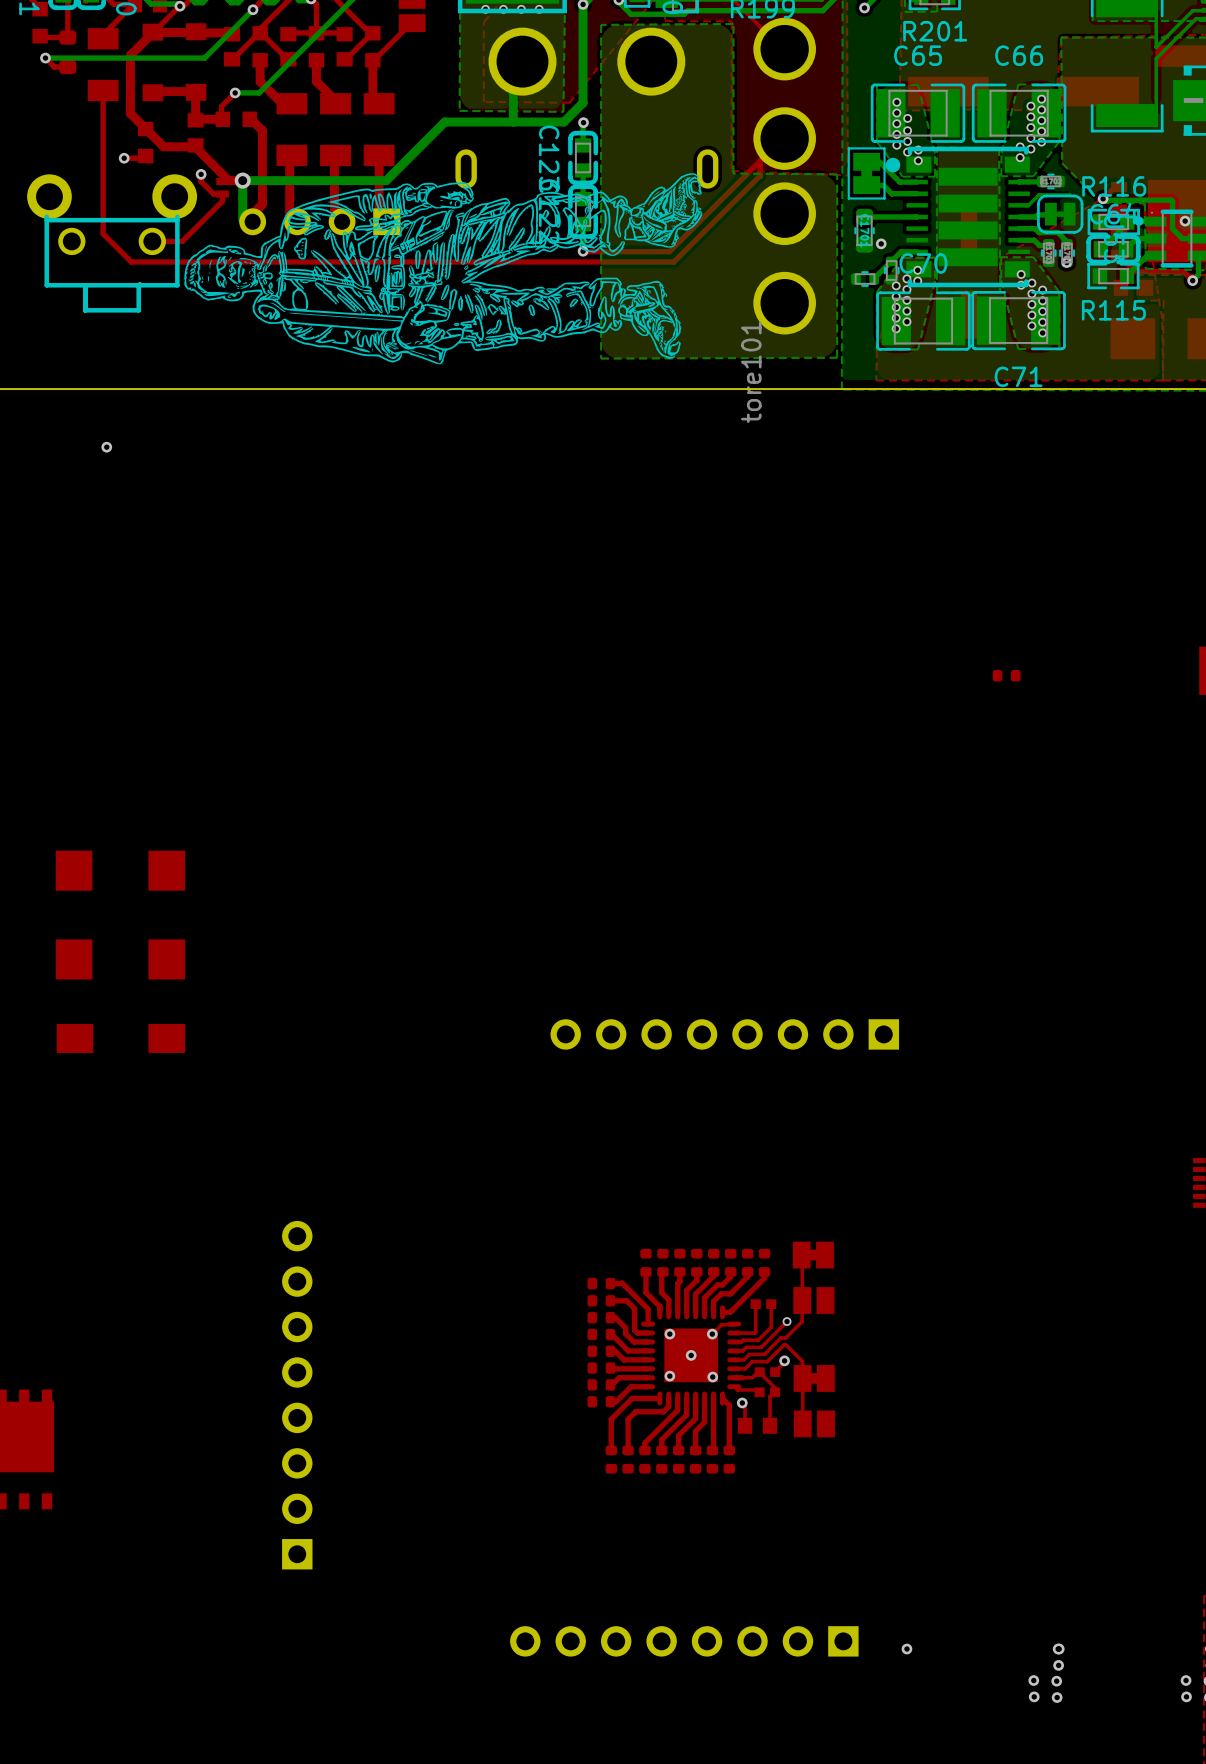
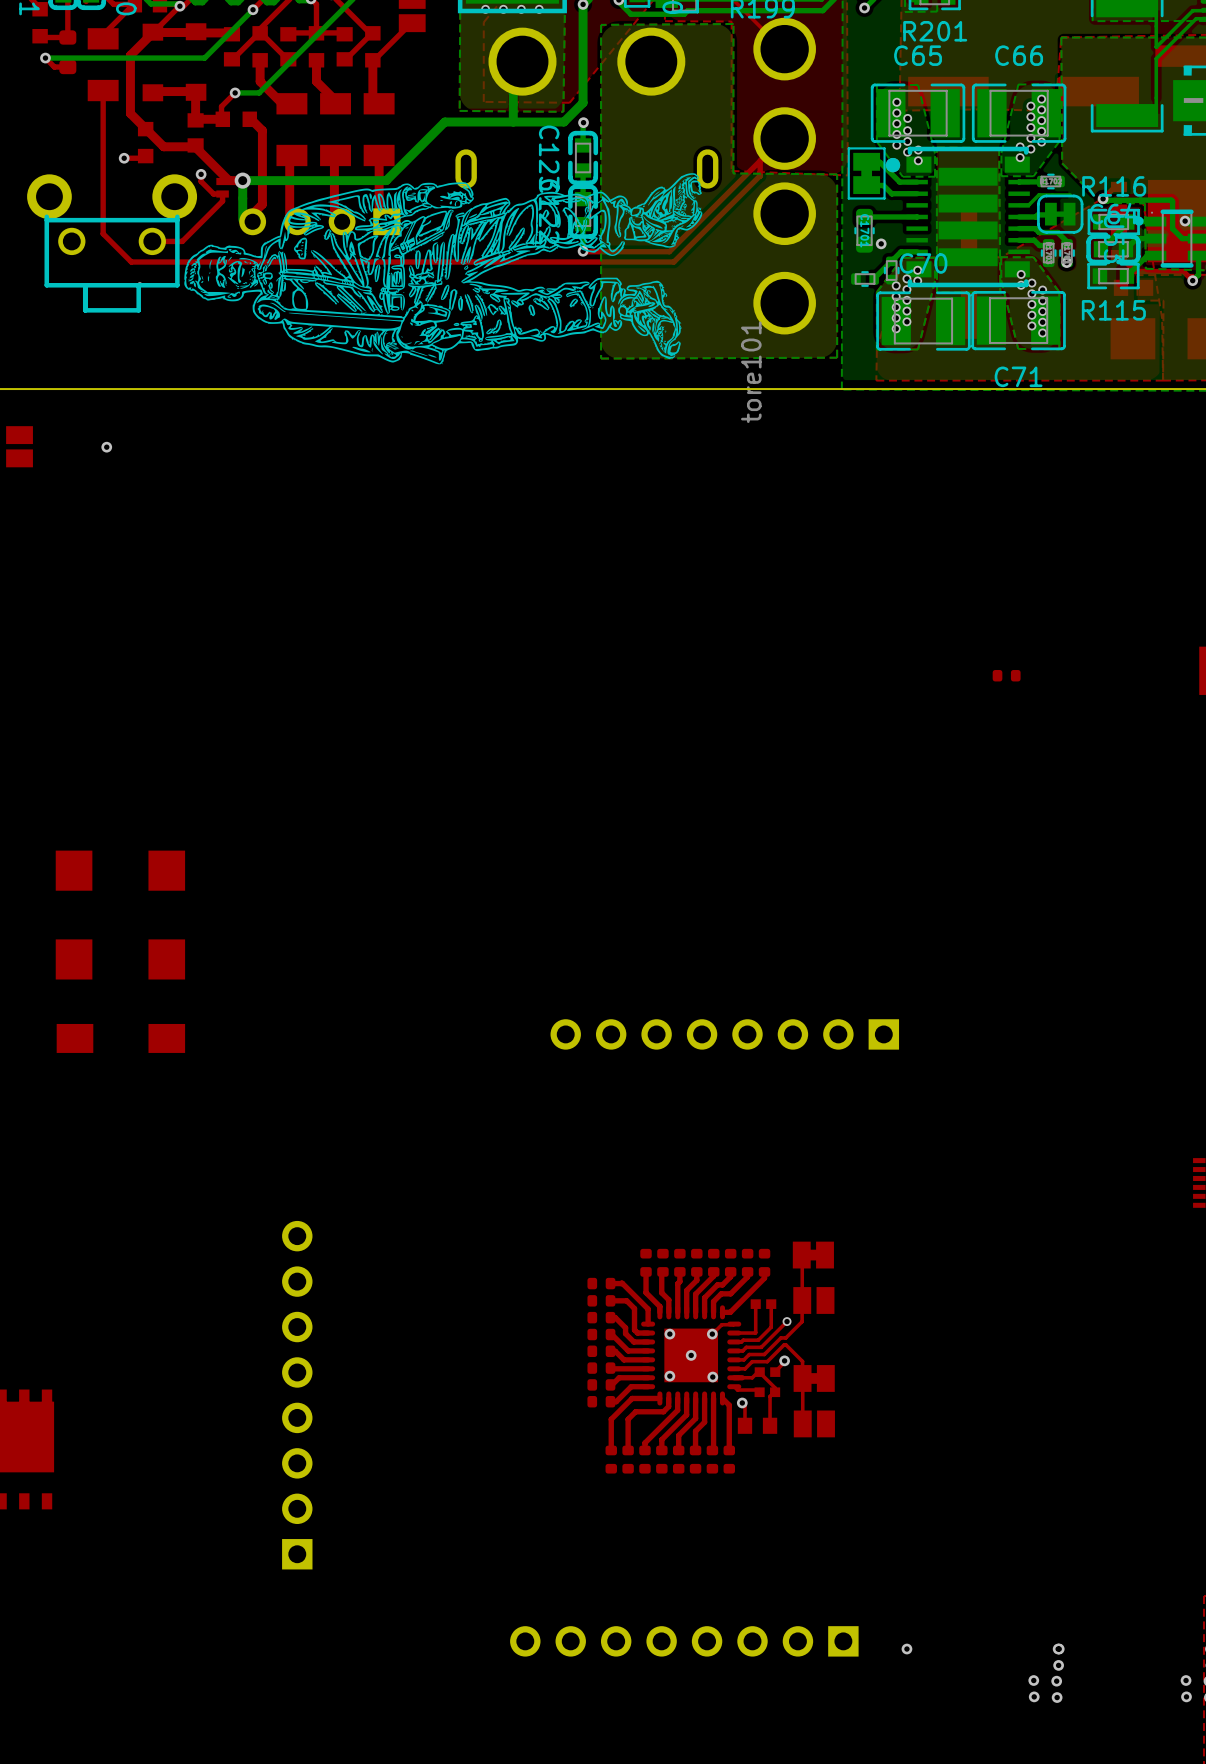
part: none -> (19, 446)

